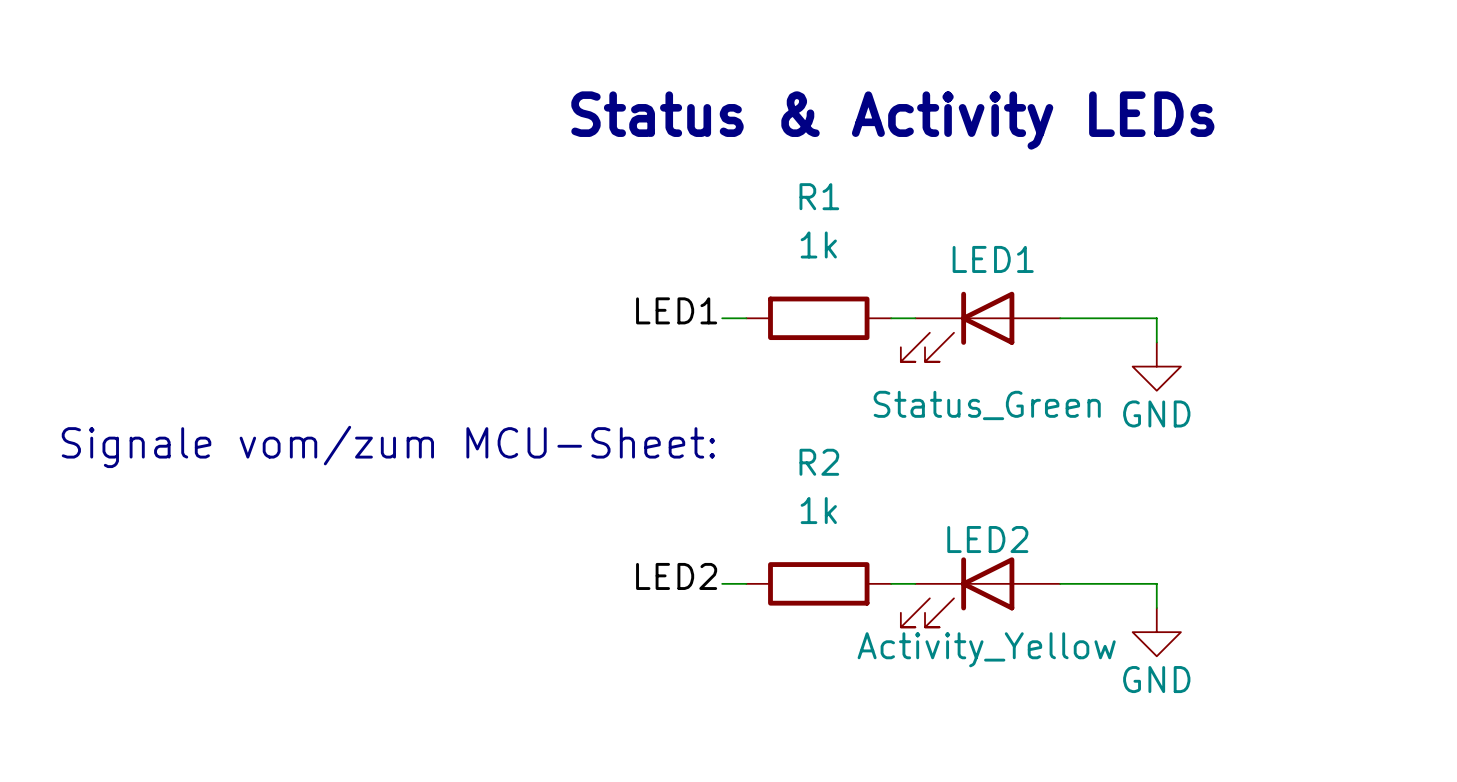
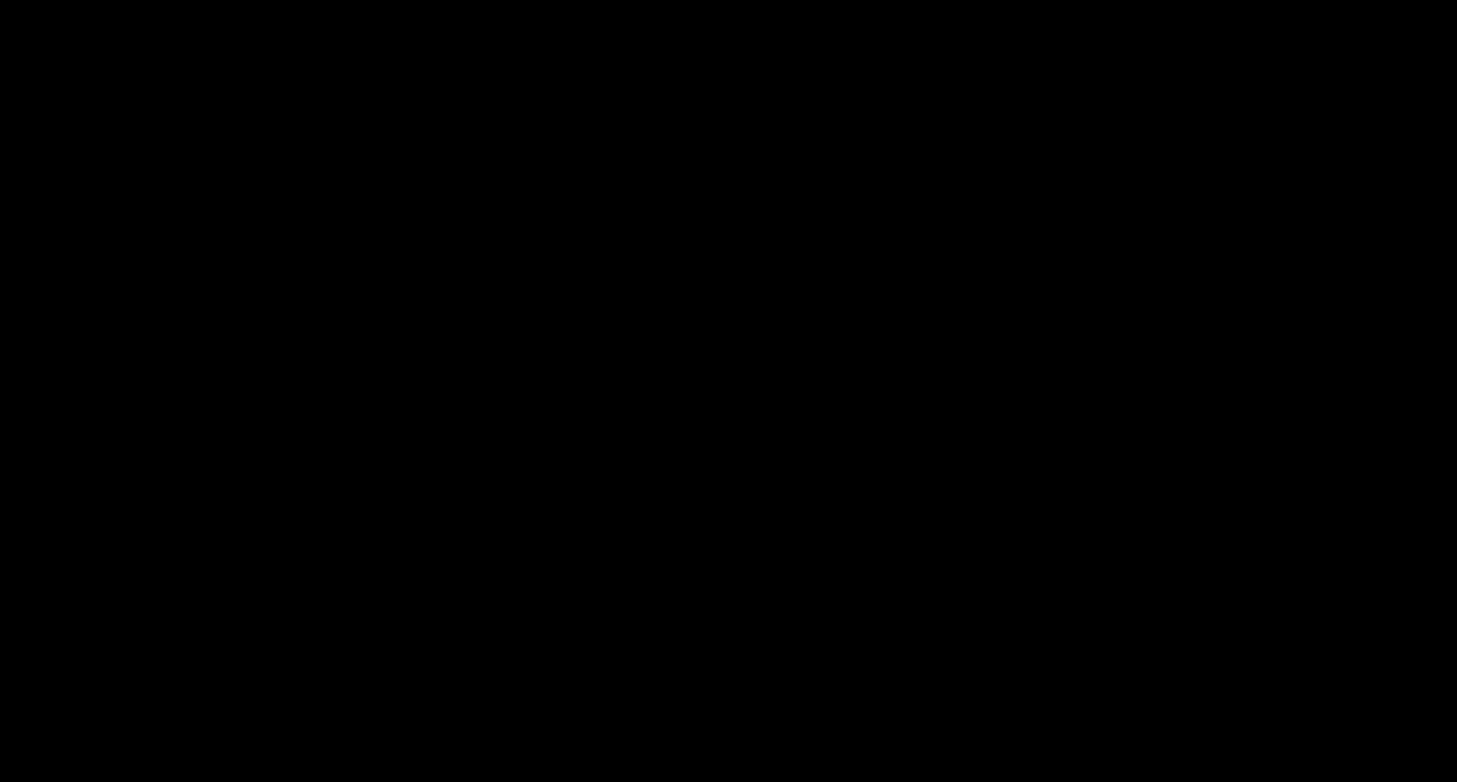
text: Status & Activity LEDs (892, 120) -> none
label: LED1 (676, 310) -> none
wire: (722, 318) (746, 318) -> none
R1: 1k (818, 318) -> none
wire: (891, 318) (915, 318) -> none
wire: (1060, 318) (1156, 318) (1156, 342) -> none
LED1: Status_Green (980, 326) -> none
power symbol: GND (1156, 366) -> none
text: Signale vom/zum MCU-Sheet: (388, 446) -> none
label: LED2 (676, 576) -> none
wire: (722, 583) (746, 583) -> none
R2: 1k (818, 583) -> none
wire: (891, 583) (915, 583) -> none
wire: (1060, 583) (1156, 583) (1156, 608) -> none
LED2: Activity_Yellow (980, 592) -> none
power symbol: GND (1156, 632) -> none

